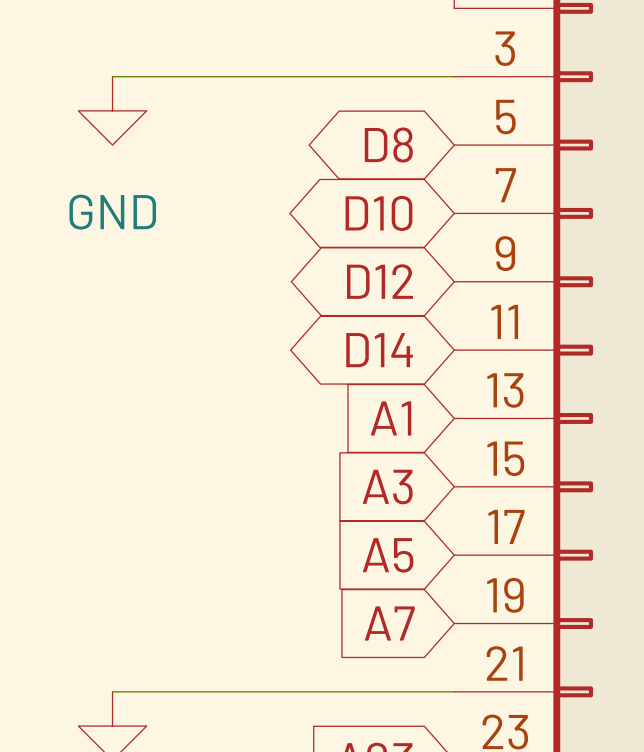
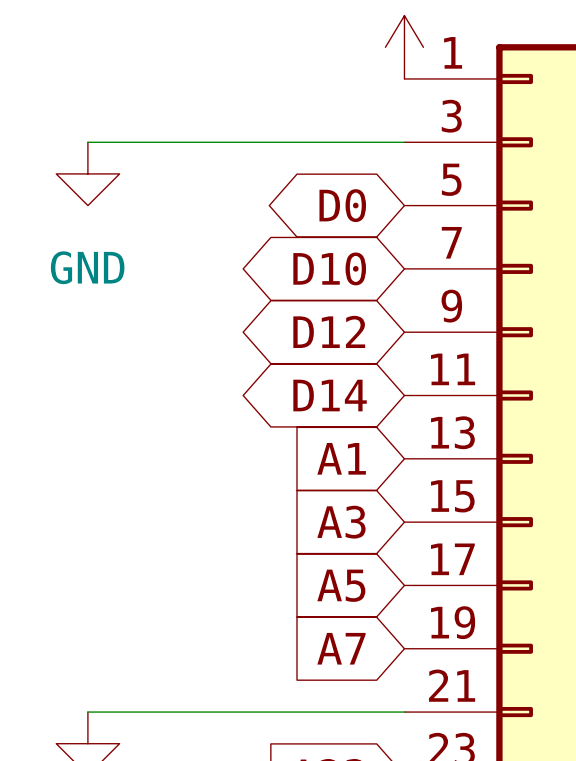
global label: D8 (388, 145) -> D0 (342, 205)

